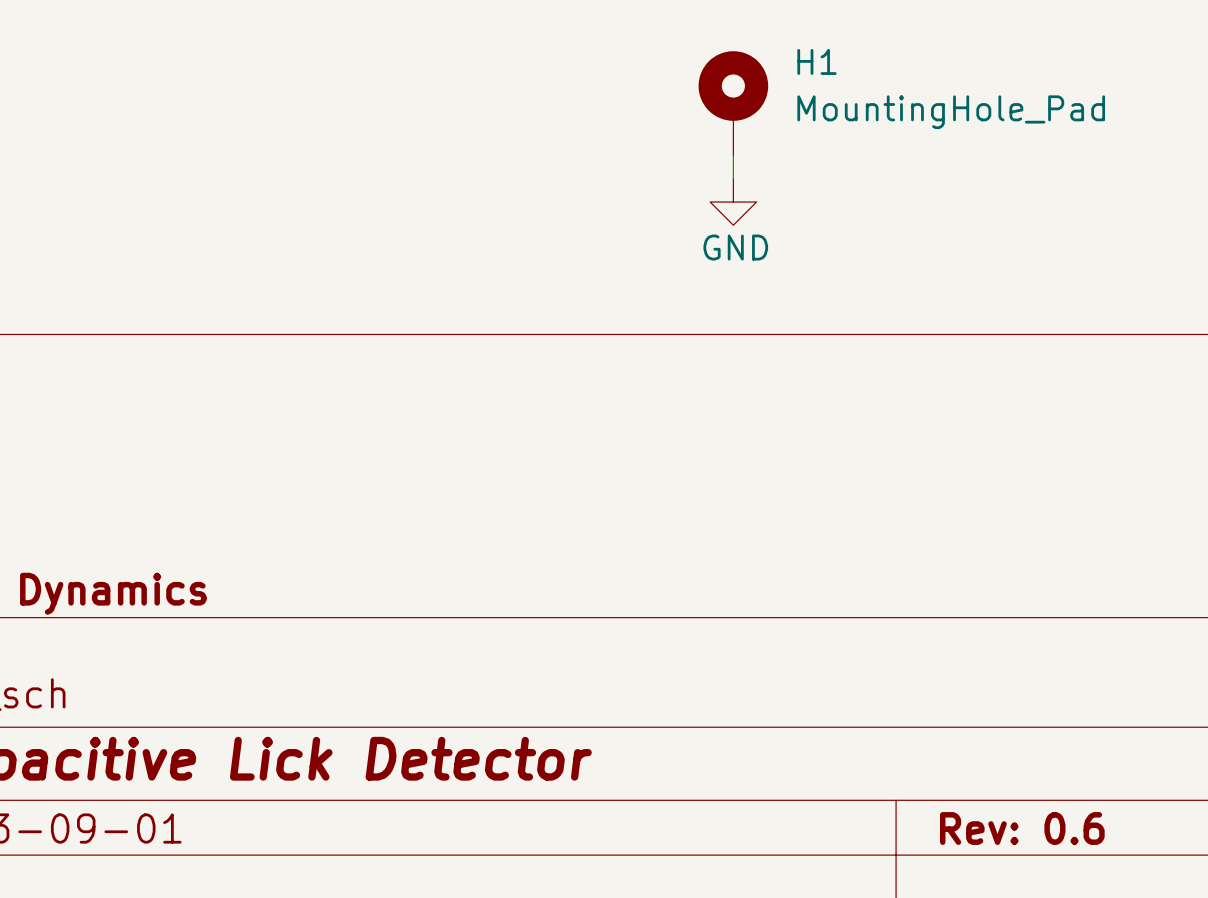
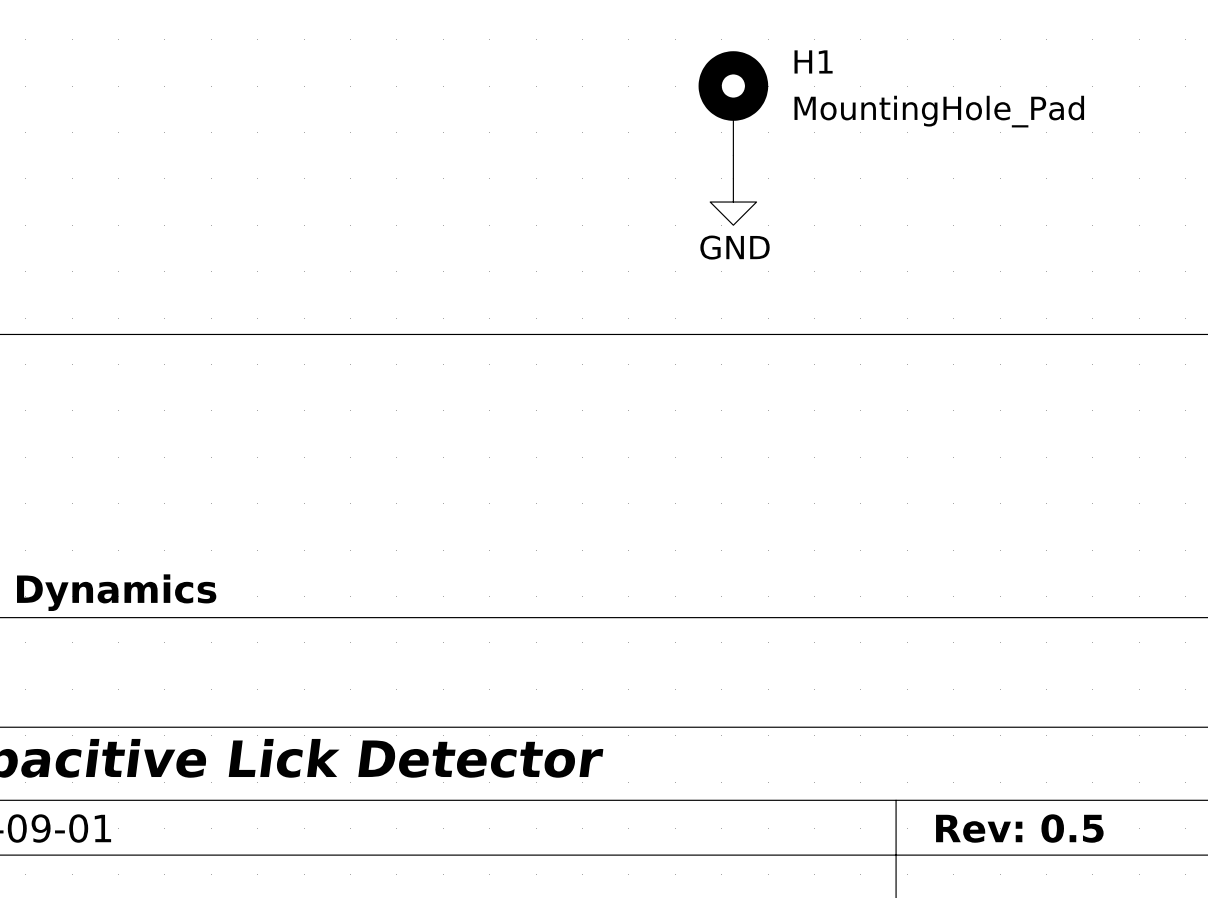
title block: Rev: 0.6 (1022, 828) -> Rev: 0.5 (1019, 828)

